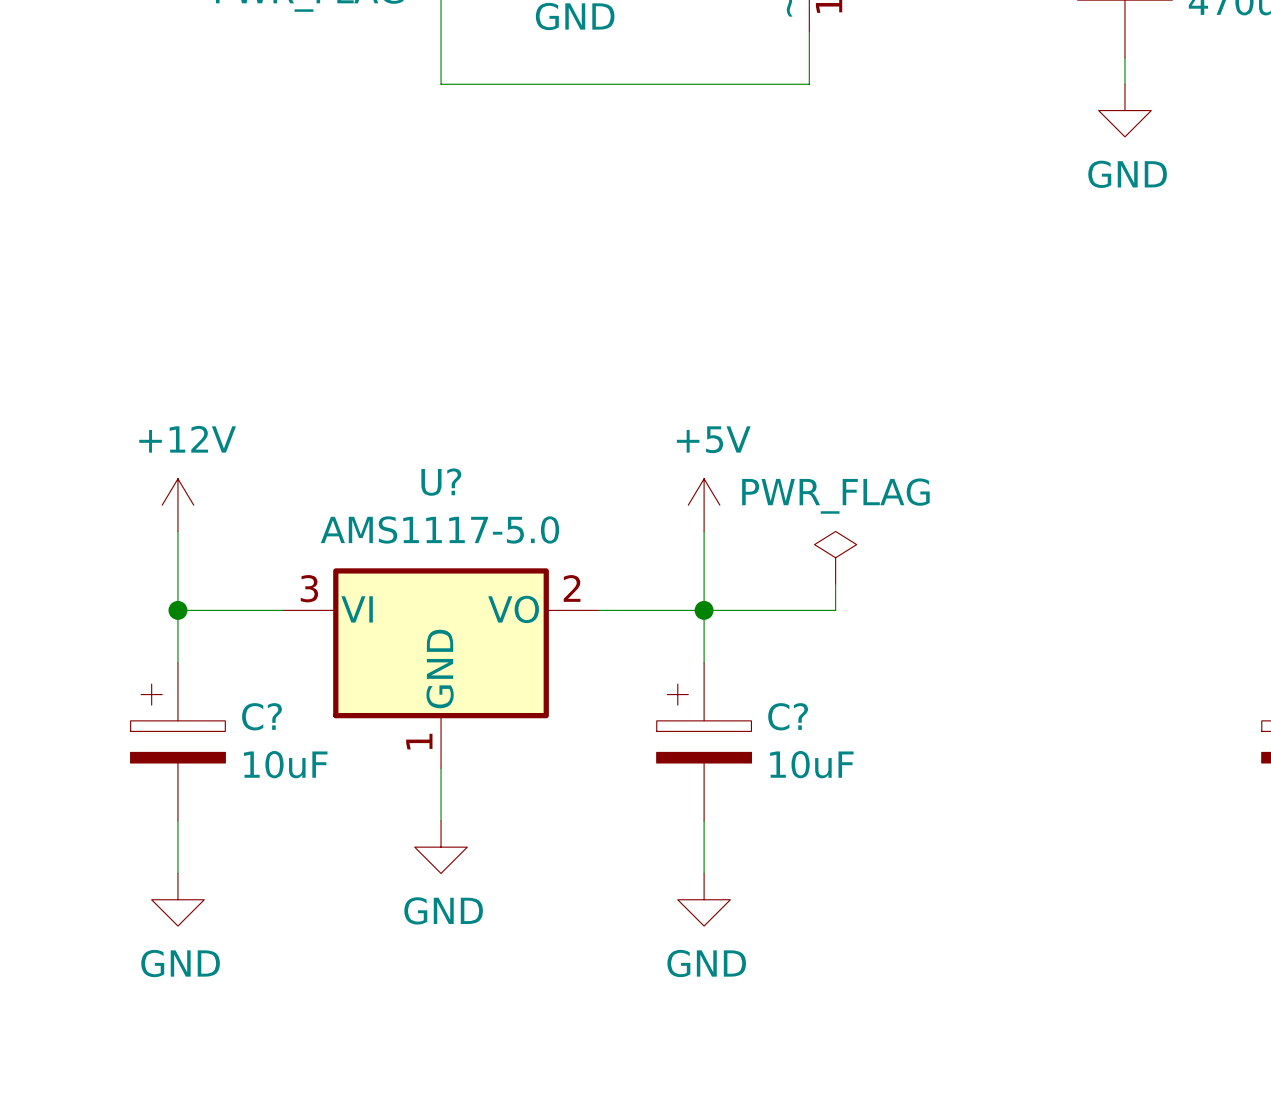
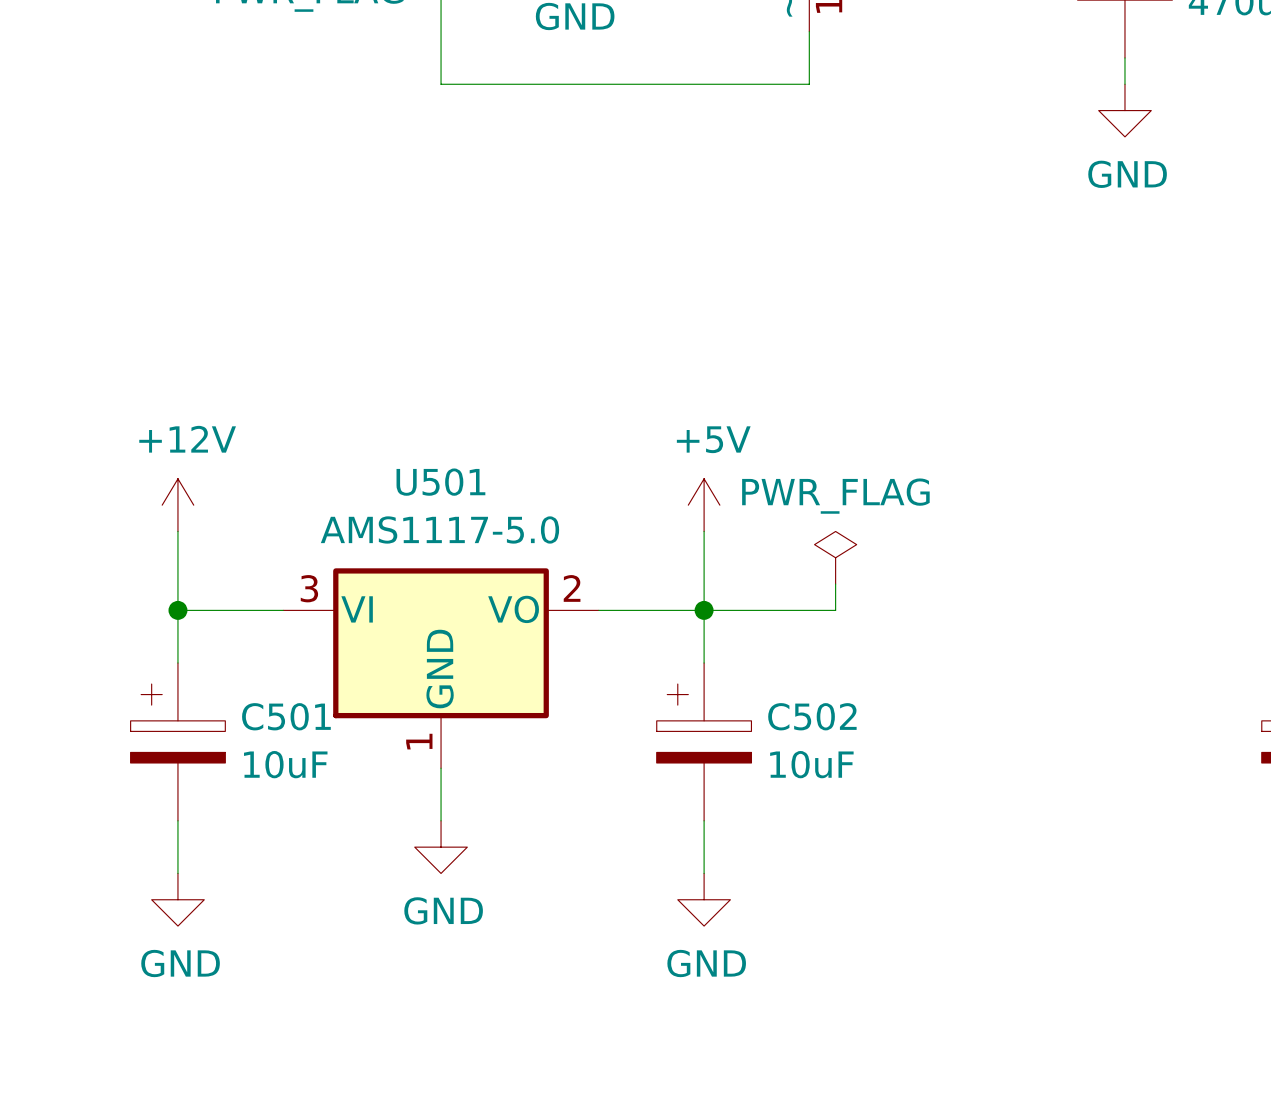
U? name: U? (441, 482) -> U501 (440, 482)
C? name: C? (261, 716) -> C501 (286, 716)
C? name: C? (788, 716) -> C502 (812, 716)

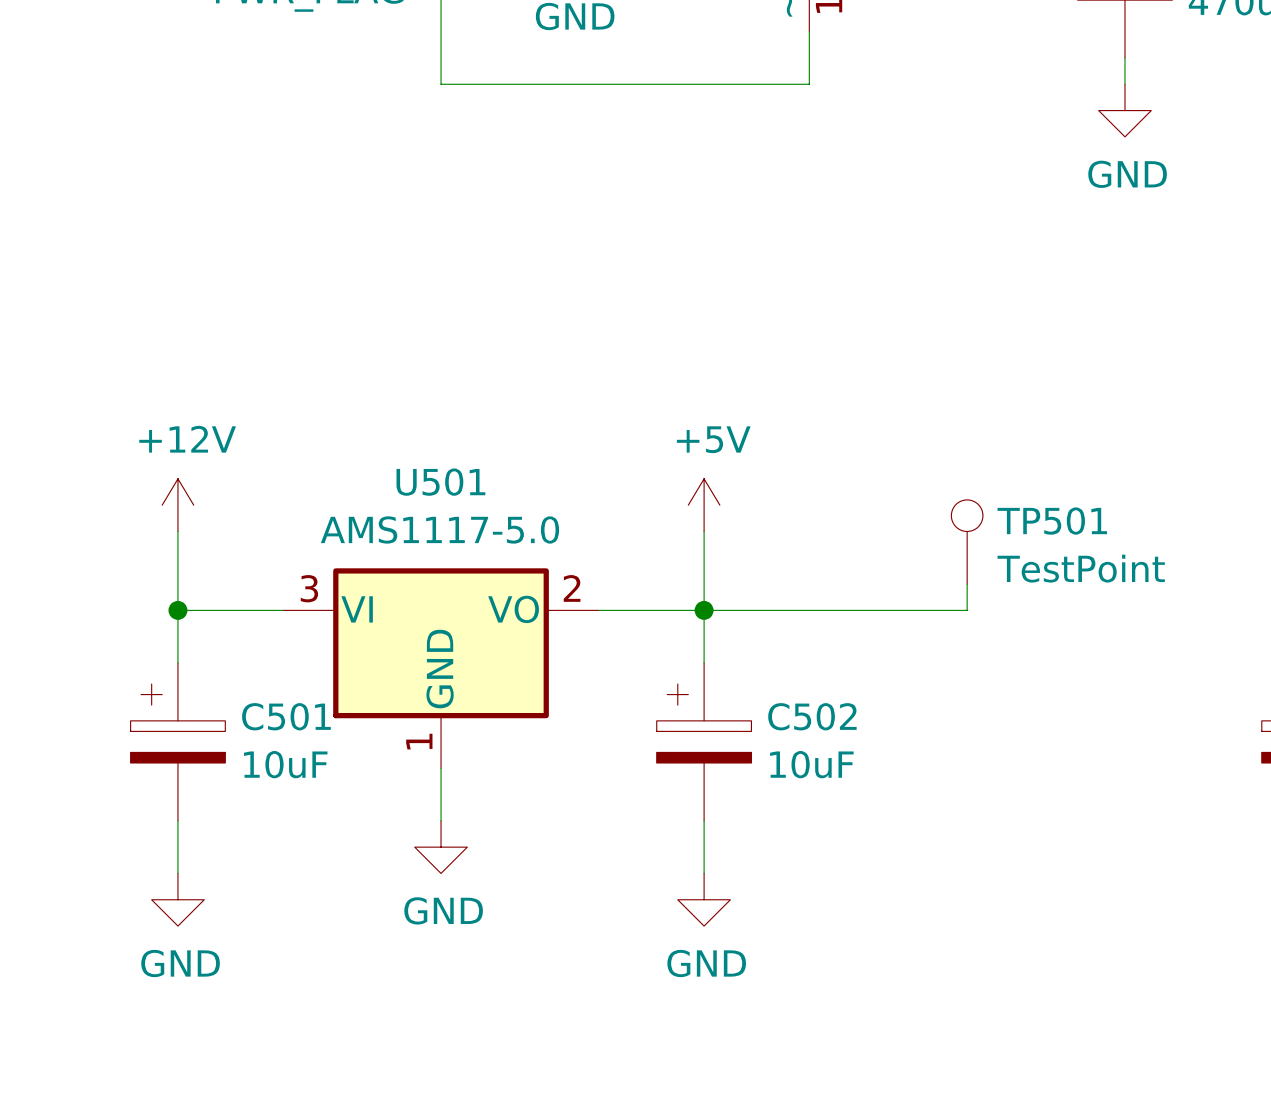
TP501: none -> TestPoint (967, 541)
power symbol: PWR_FLAG (835, 557) -> none
wire: (835, 584) (835, 610) -> (967, 584) (967, 610) (835, 610)

